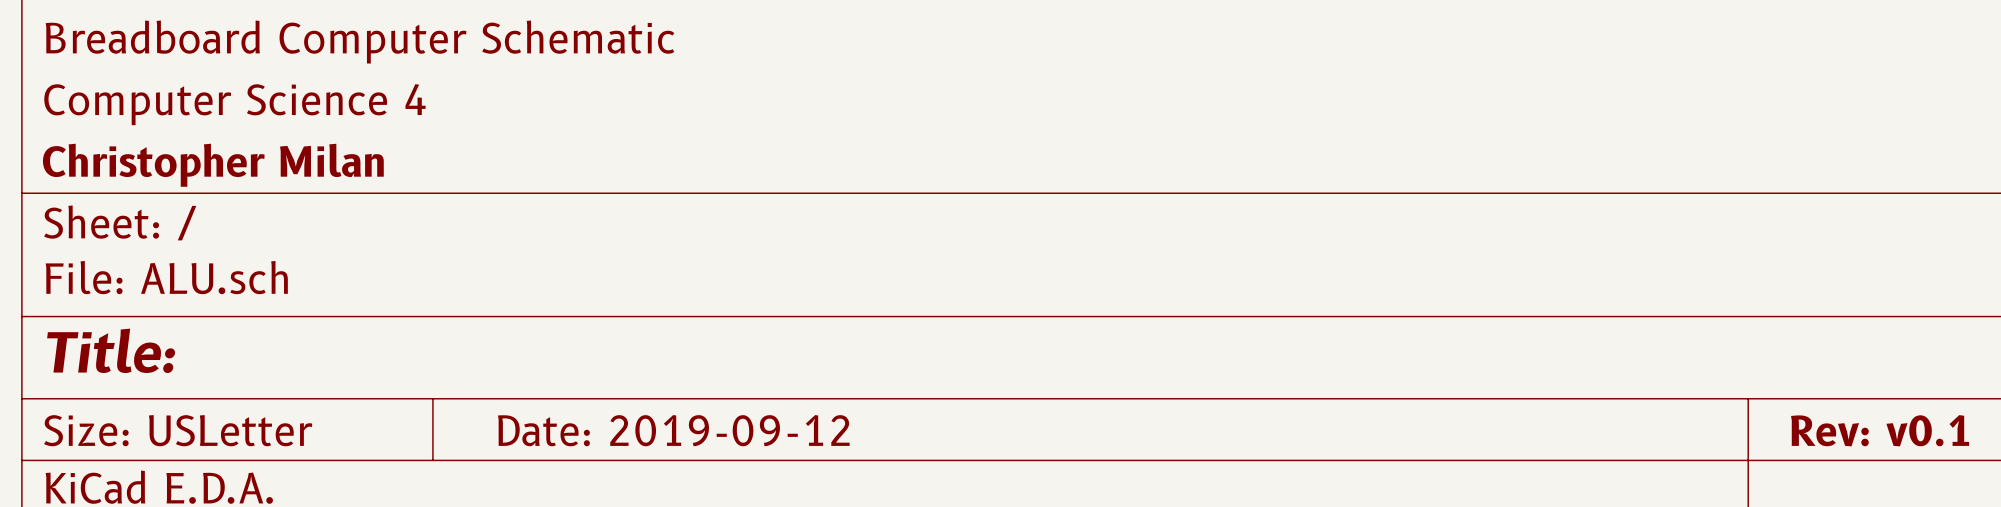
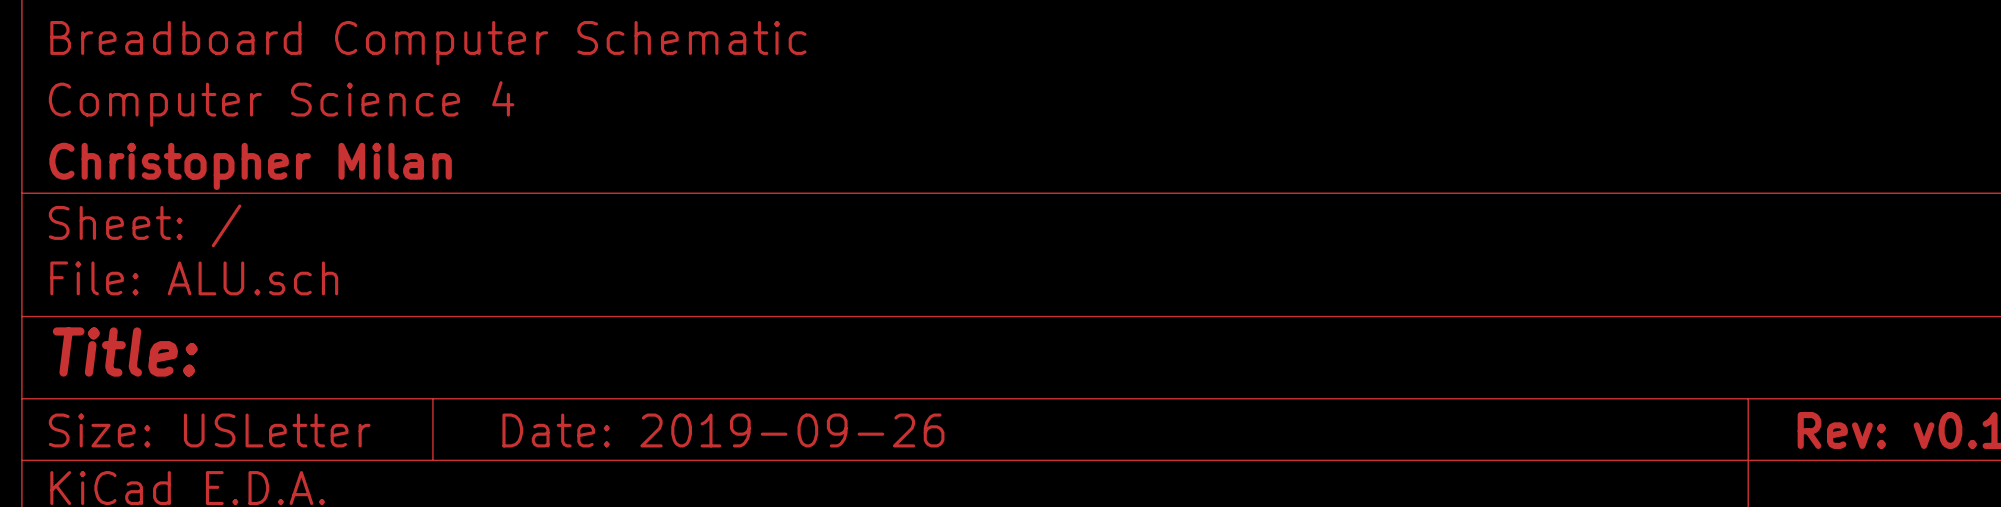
title block: Date: 2019-09-12 (673, 430) -> Date: 2019-09-26 (723, 430)

